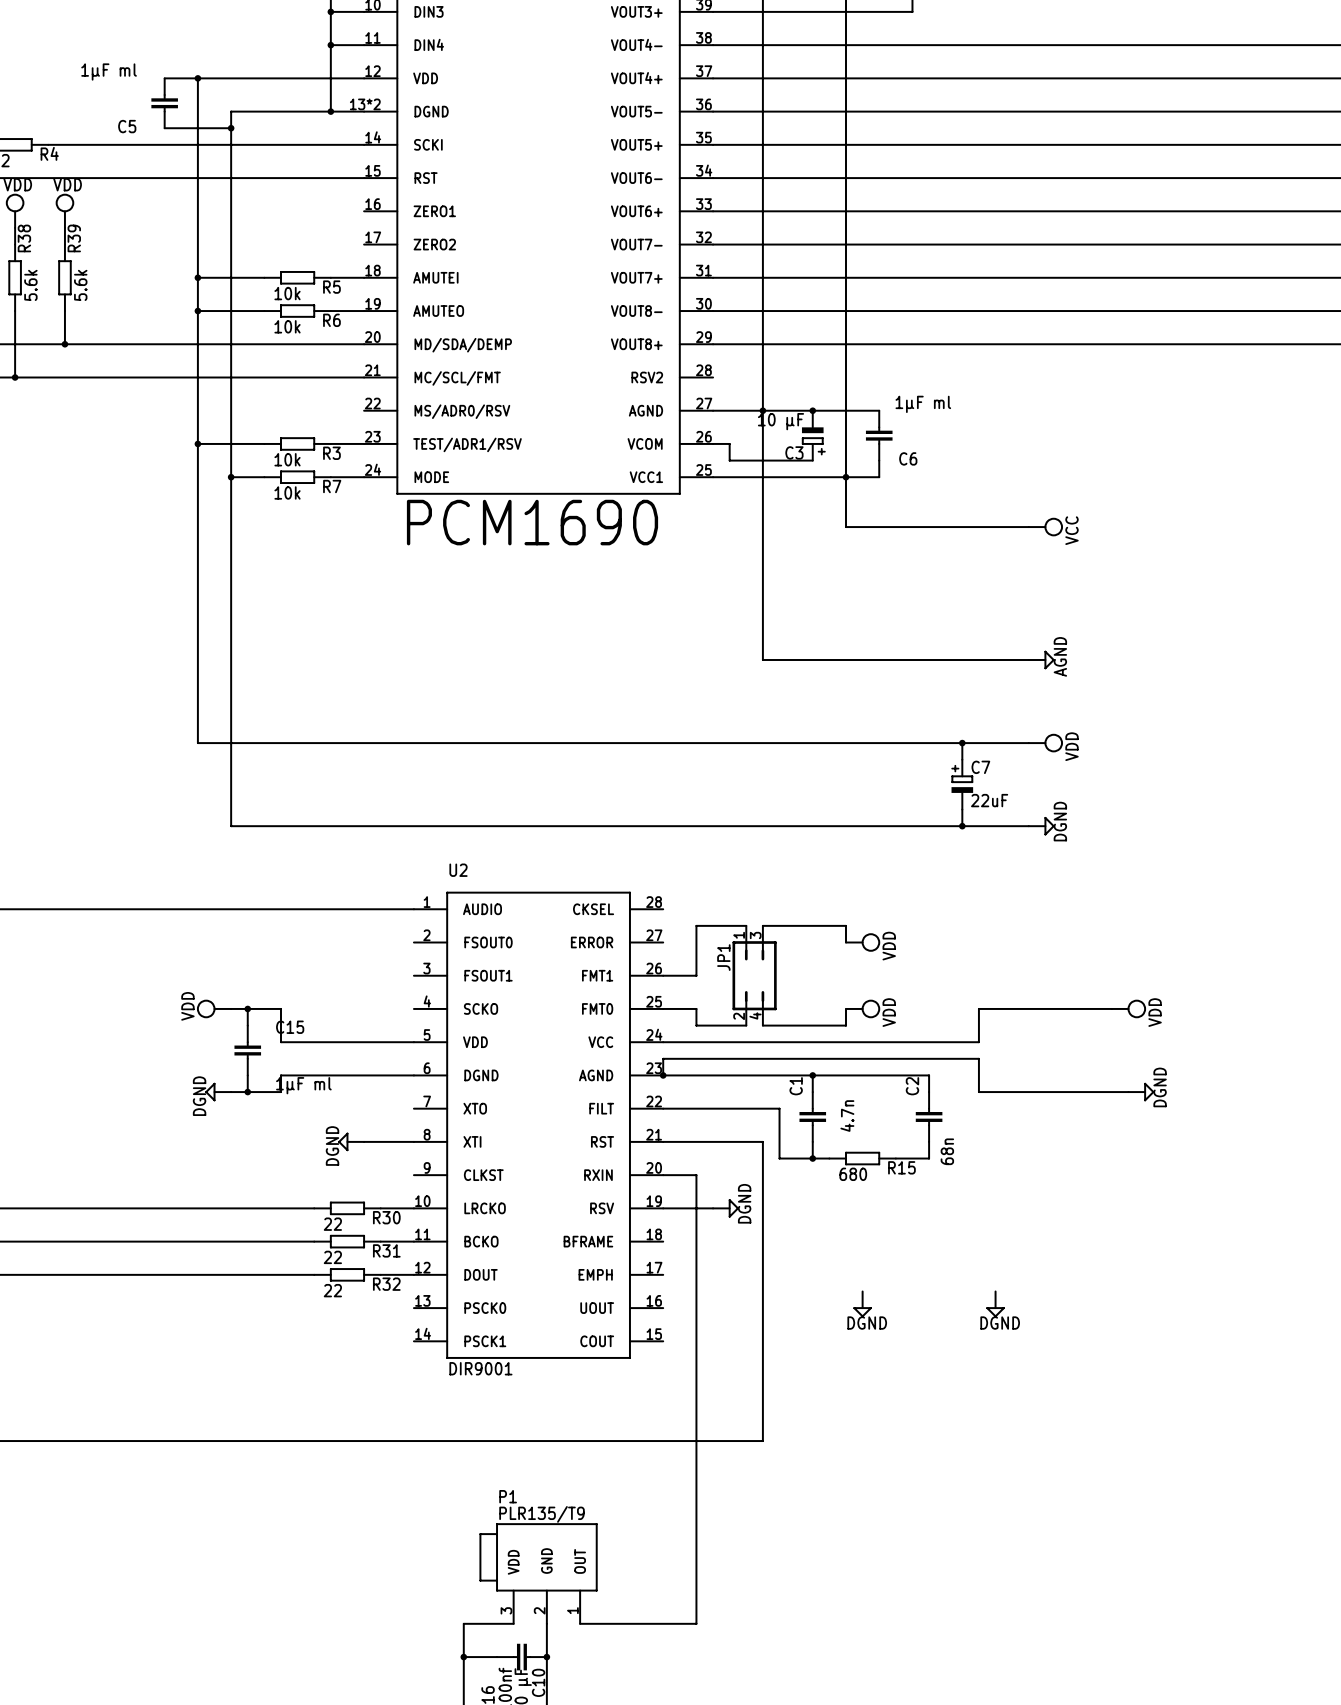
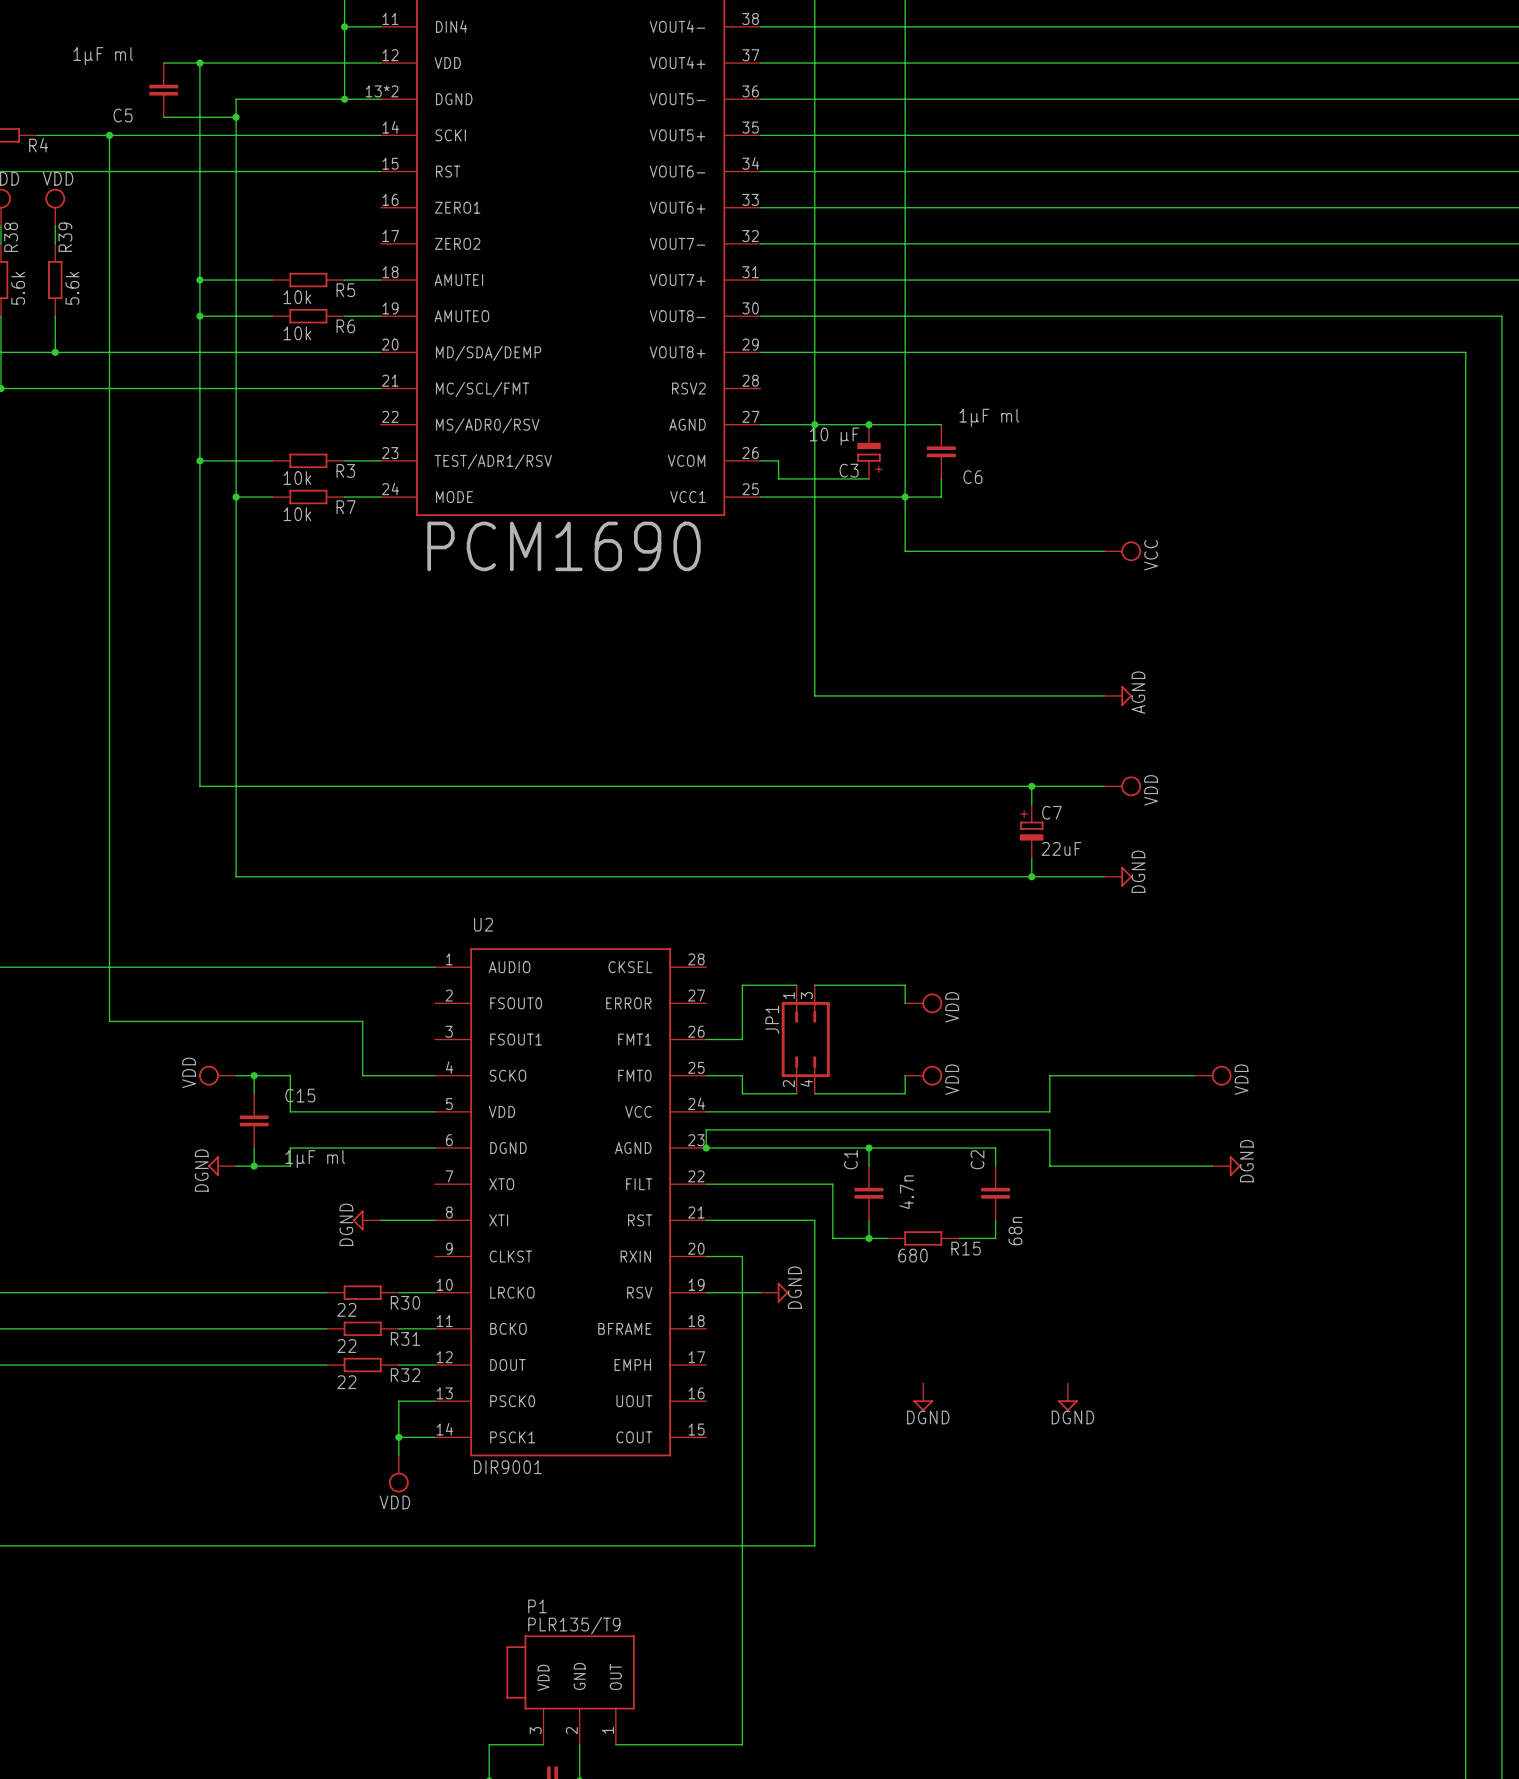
wire: none -> (109, 135) (109, 1021) (362, 1021) (362, 1075) (435, 1075)
junction: none -> (109, 135)
wire: none -> (435, 1401) (398, 1401) (398, 1455)
wire: none -> (398, 1437) (435, 1437)
junction: none -> (398, 1437)
power symbol: none -> VDD (398, 1473)

